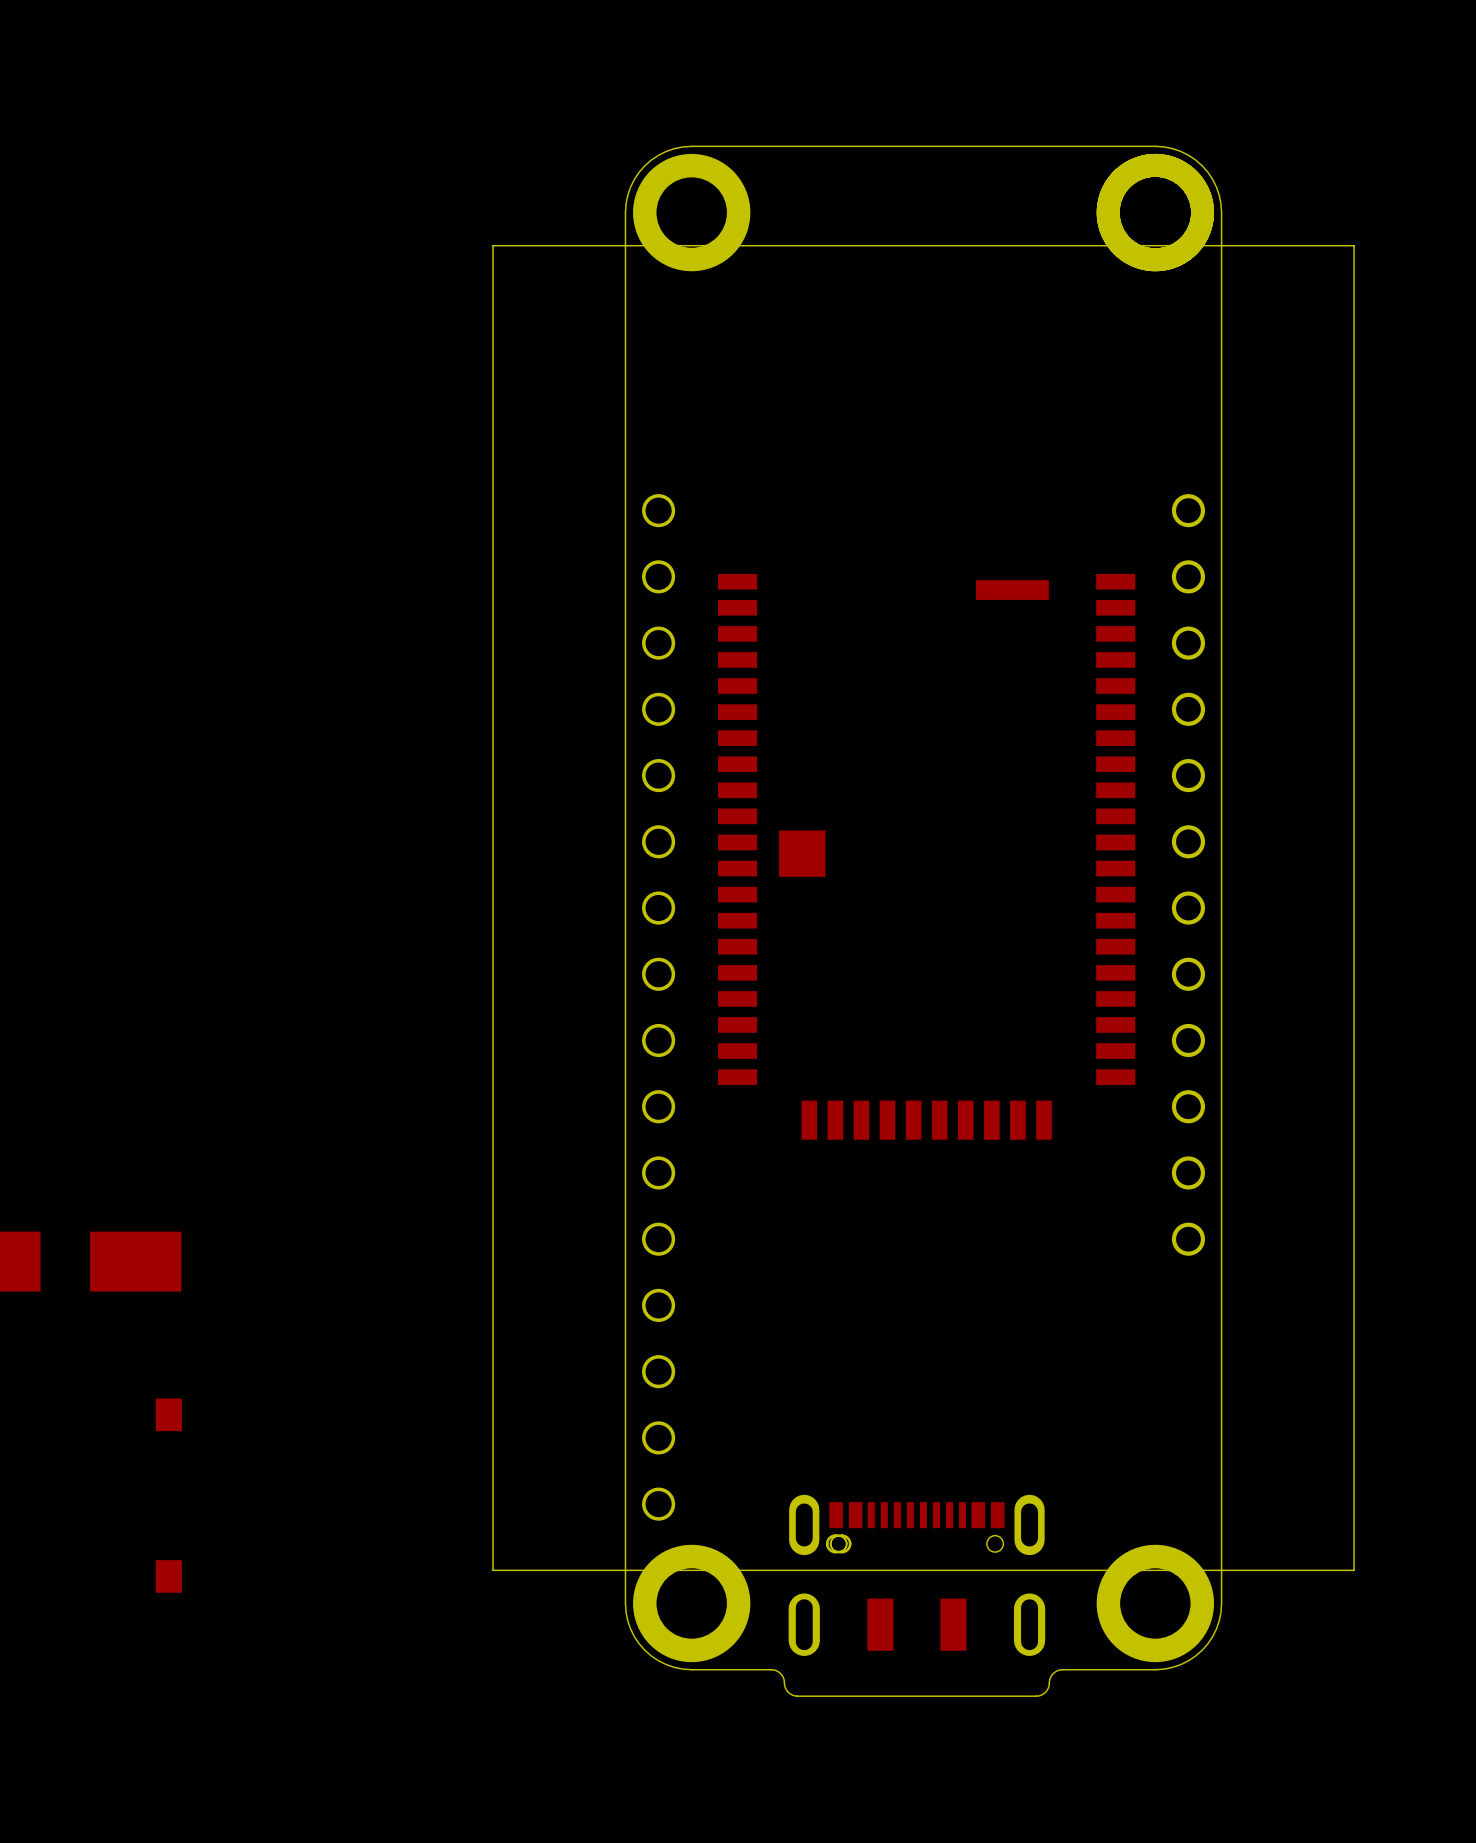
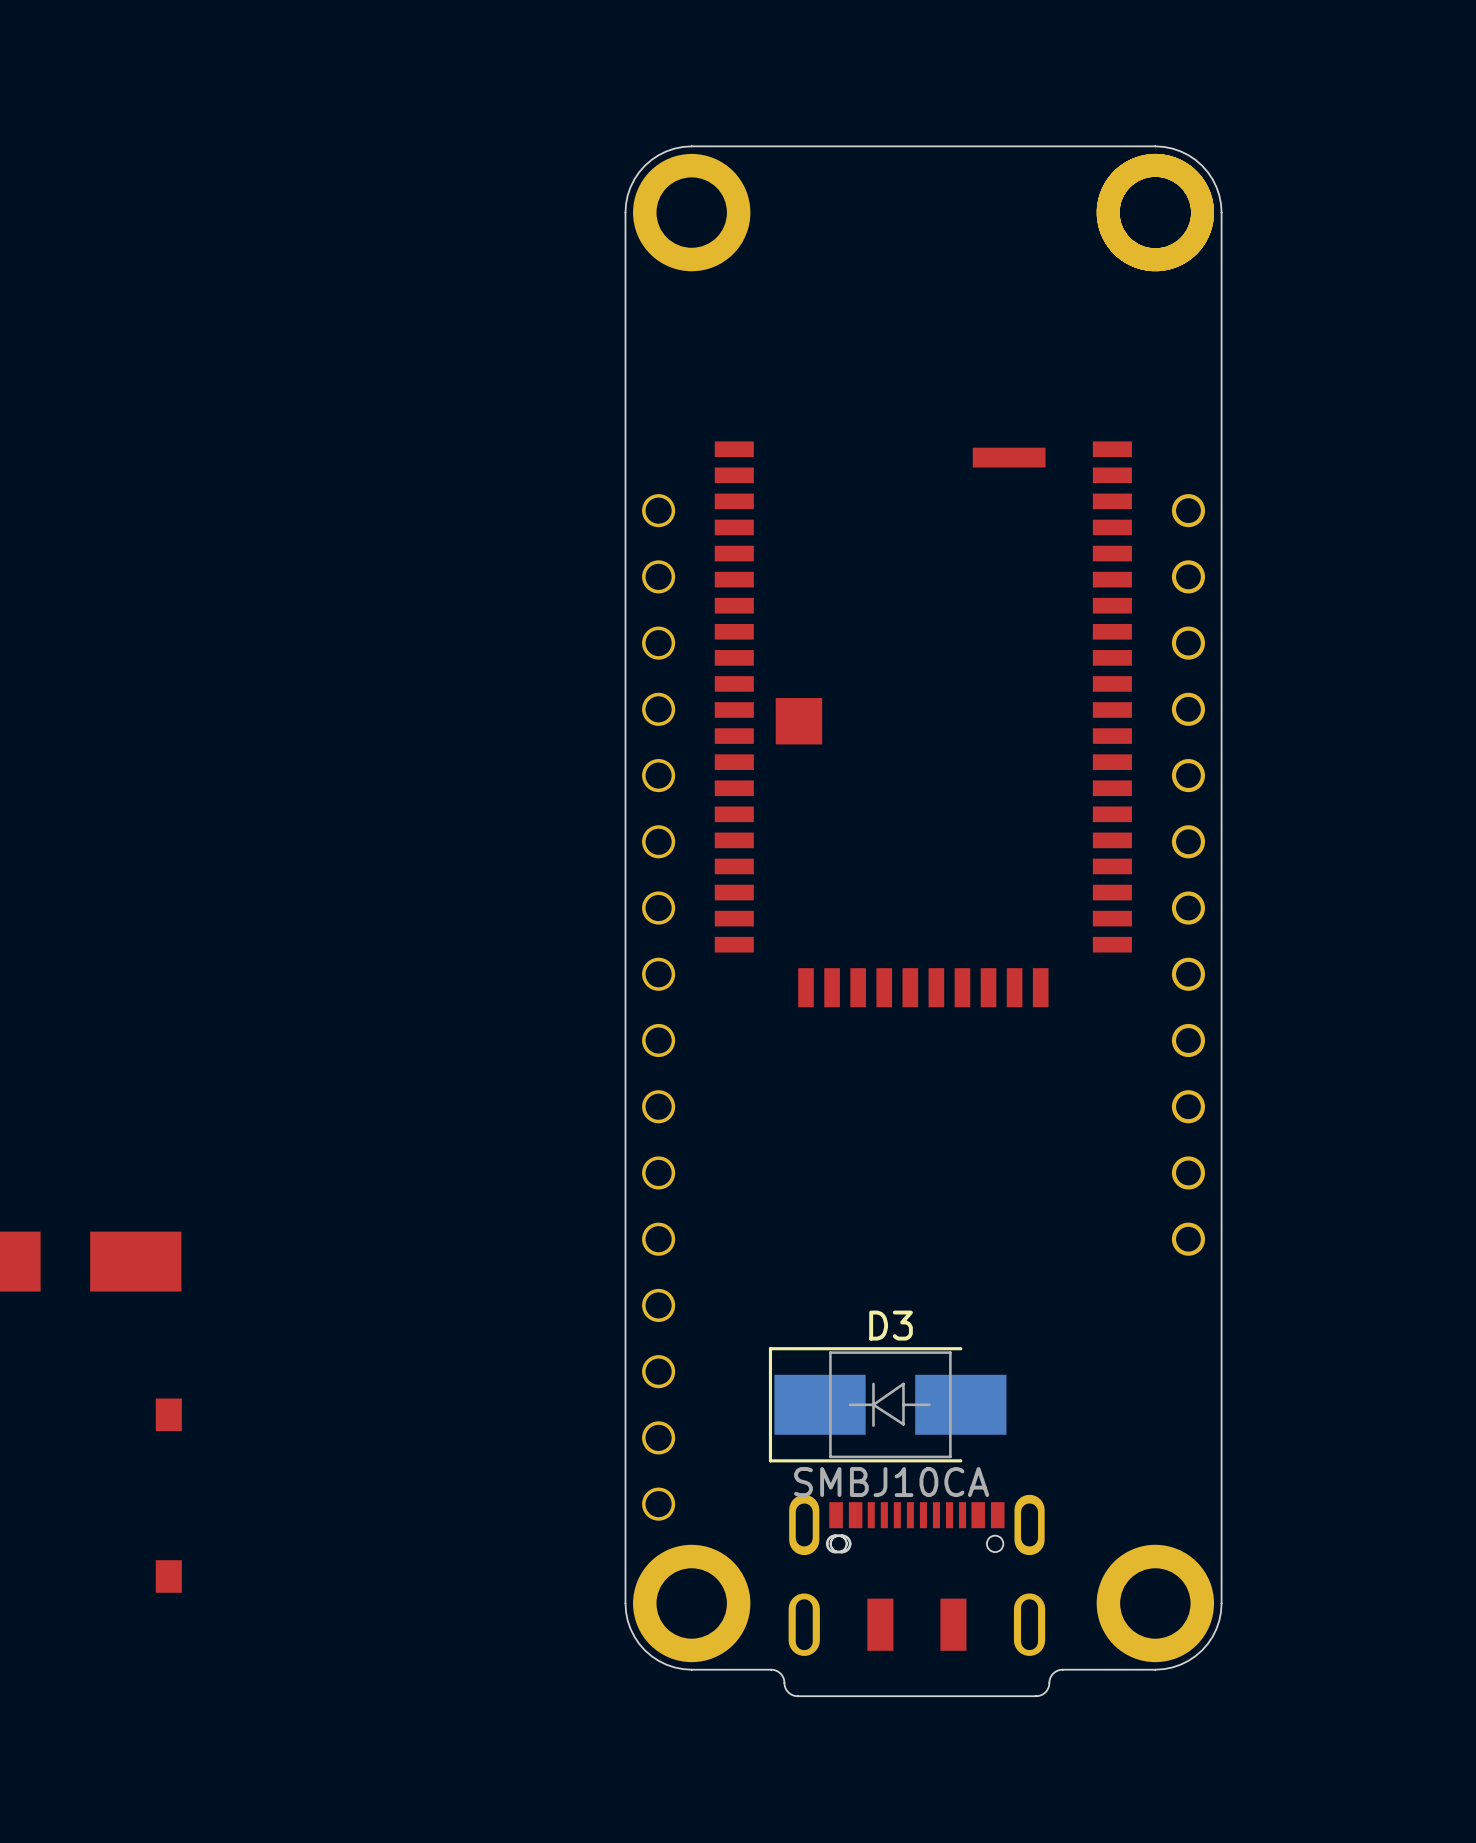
board edge: (1354, 245) (493, 245) (493, 1570) (1354, 1570) (1354, 245) -> none
part position: (926, 856) -> (923, 724)
D3: none -> SMBJ10CA (887, 1404)

